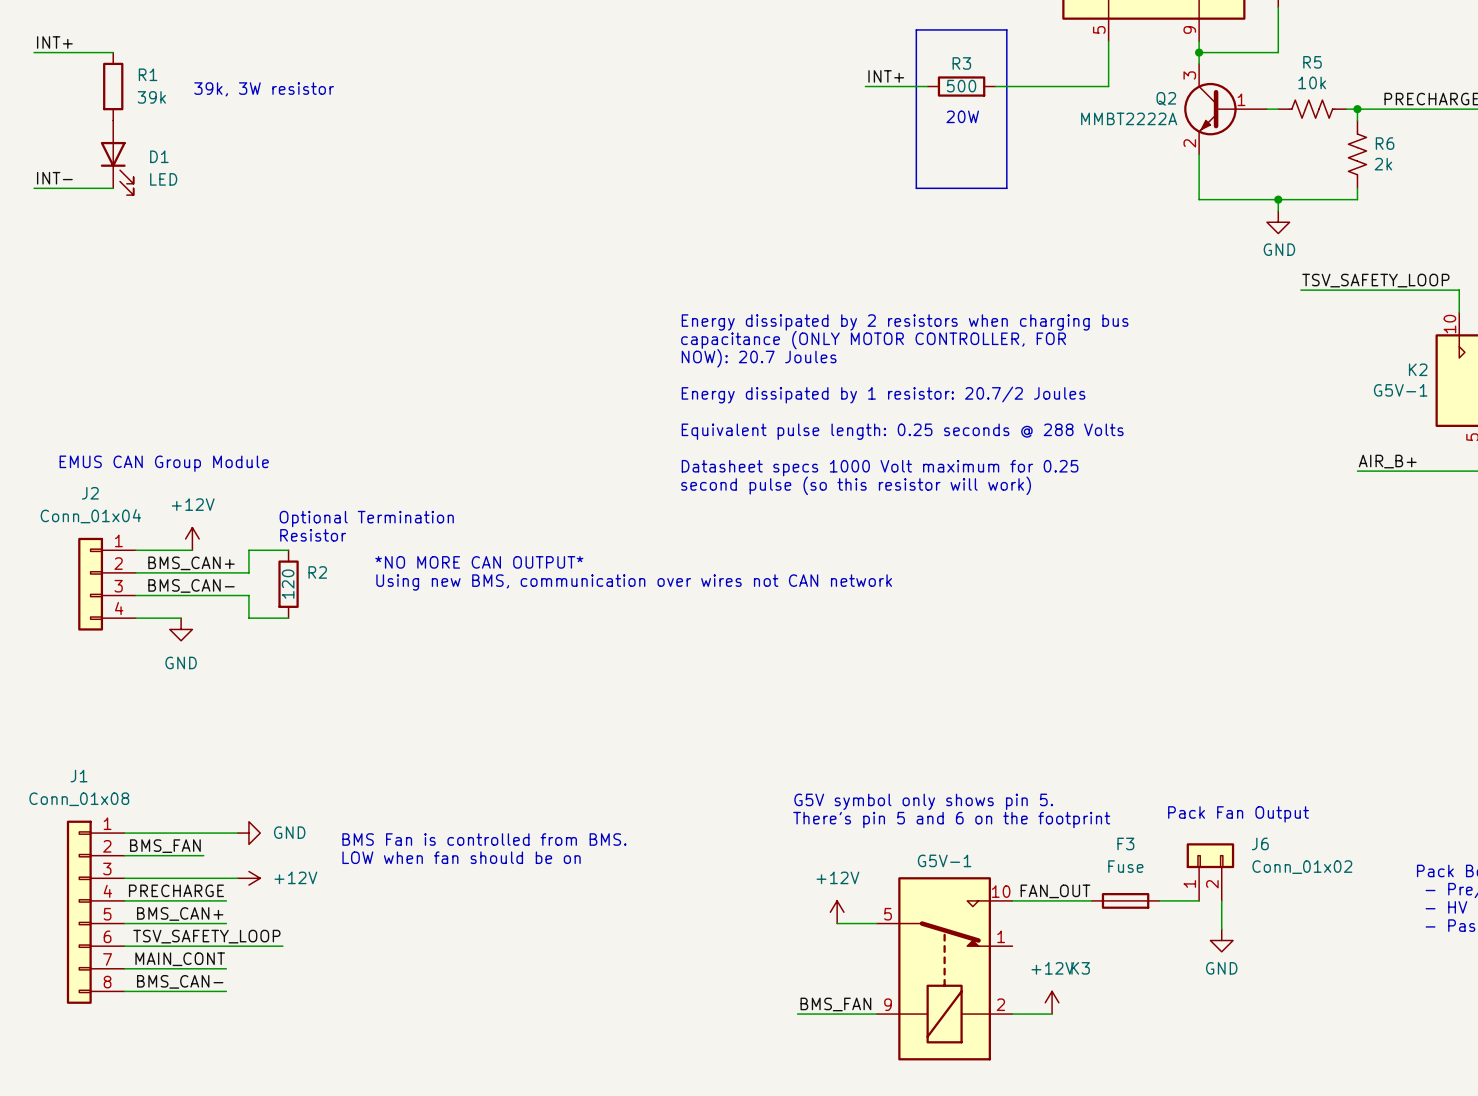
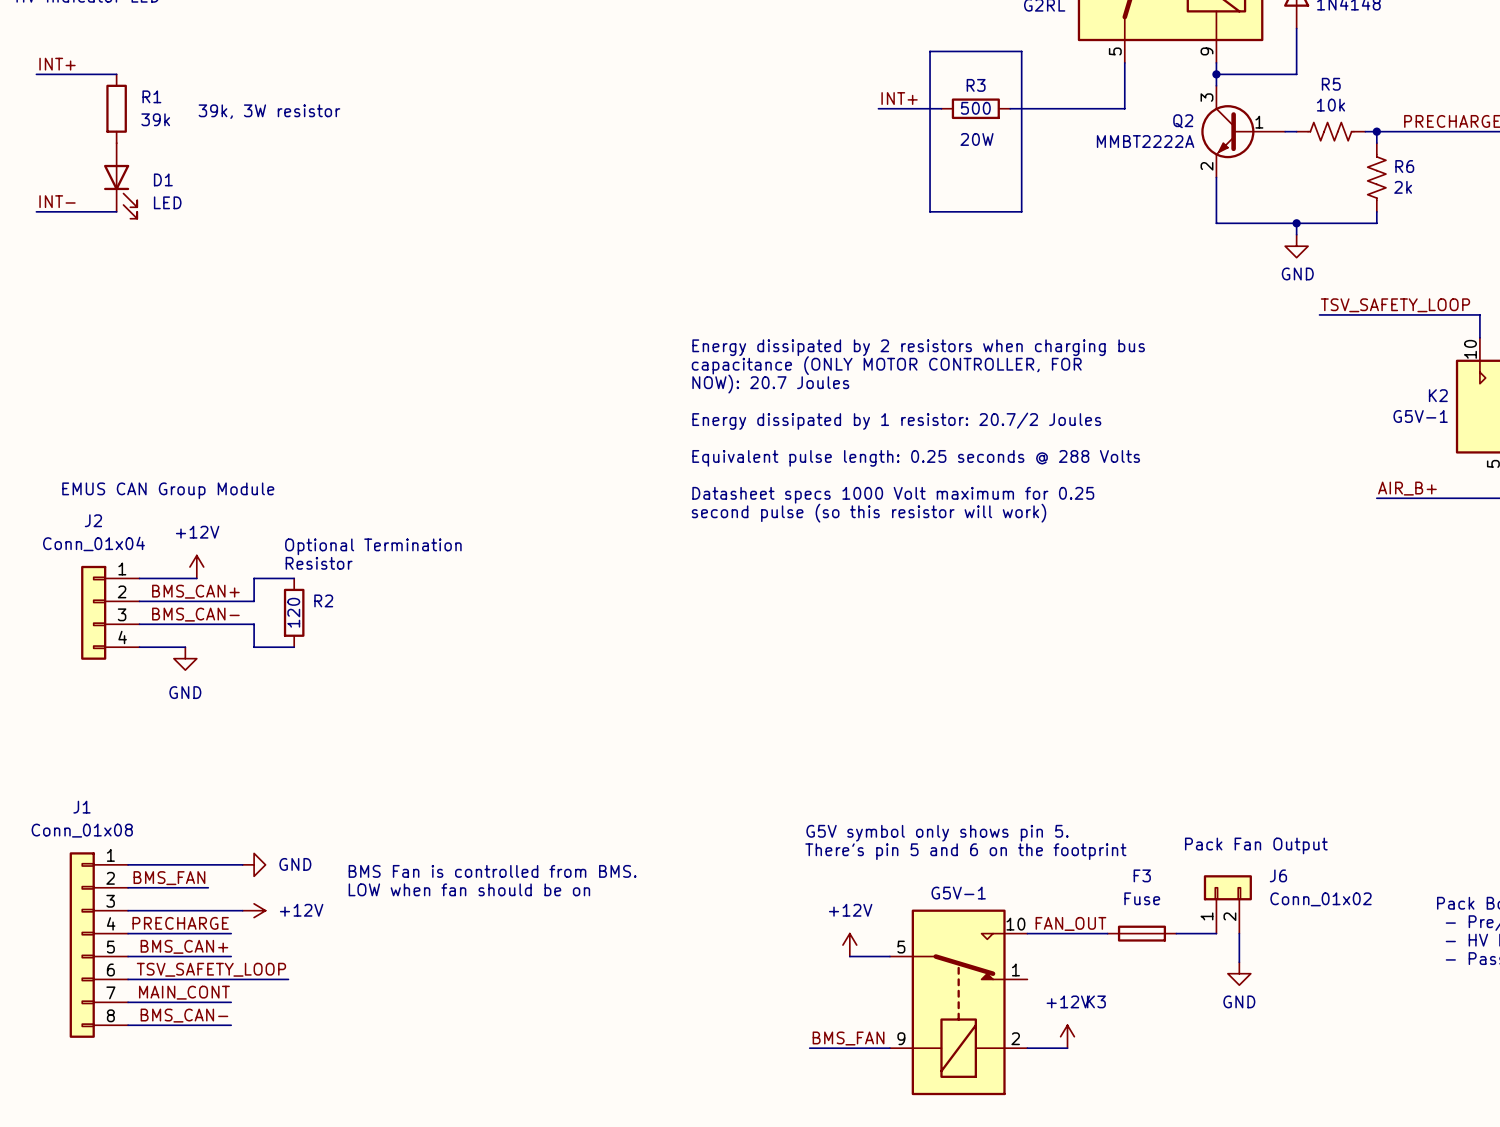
text: *NO MORE CAN OUTPUT* (479, 562) -> none
text: Using new BMS, communication over wires not CAN network (634, 582) -> none

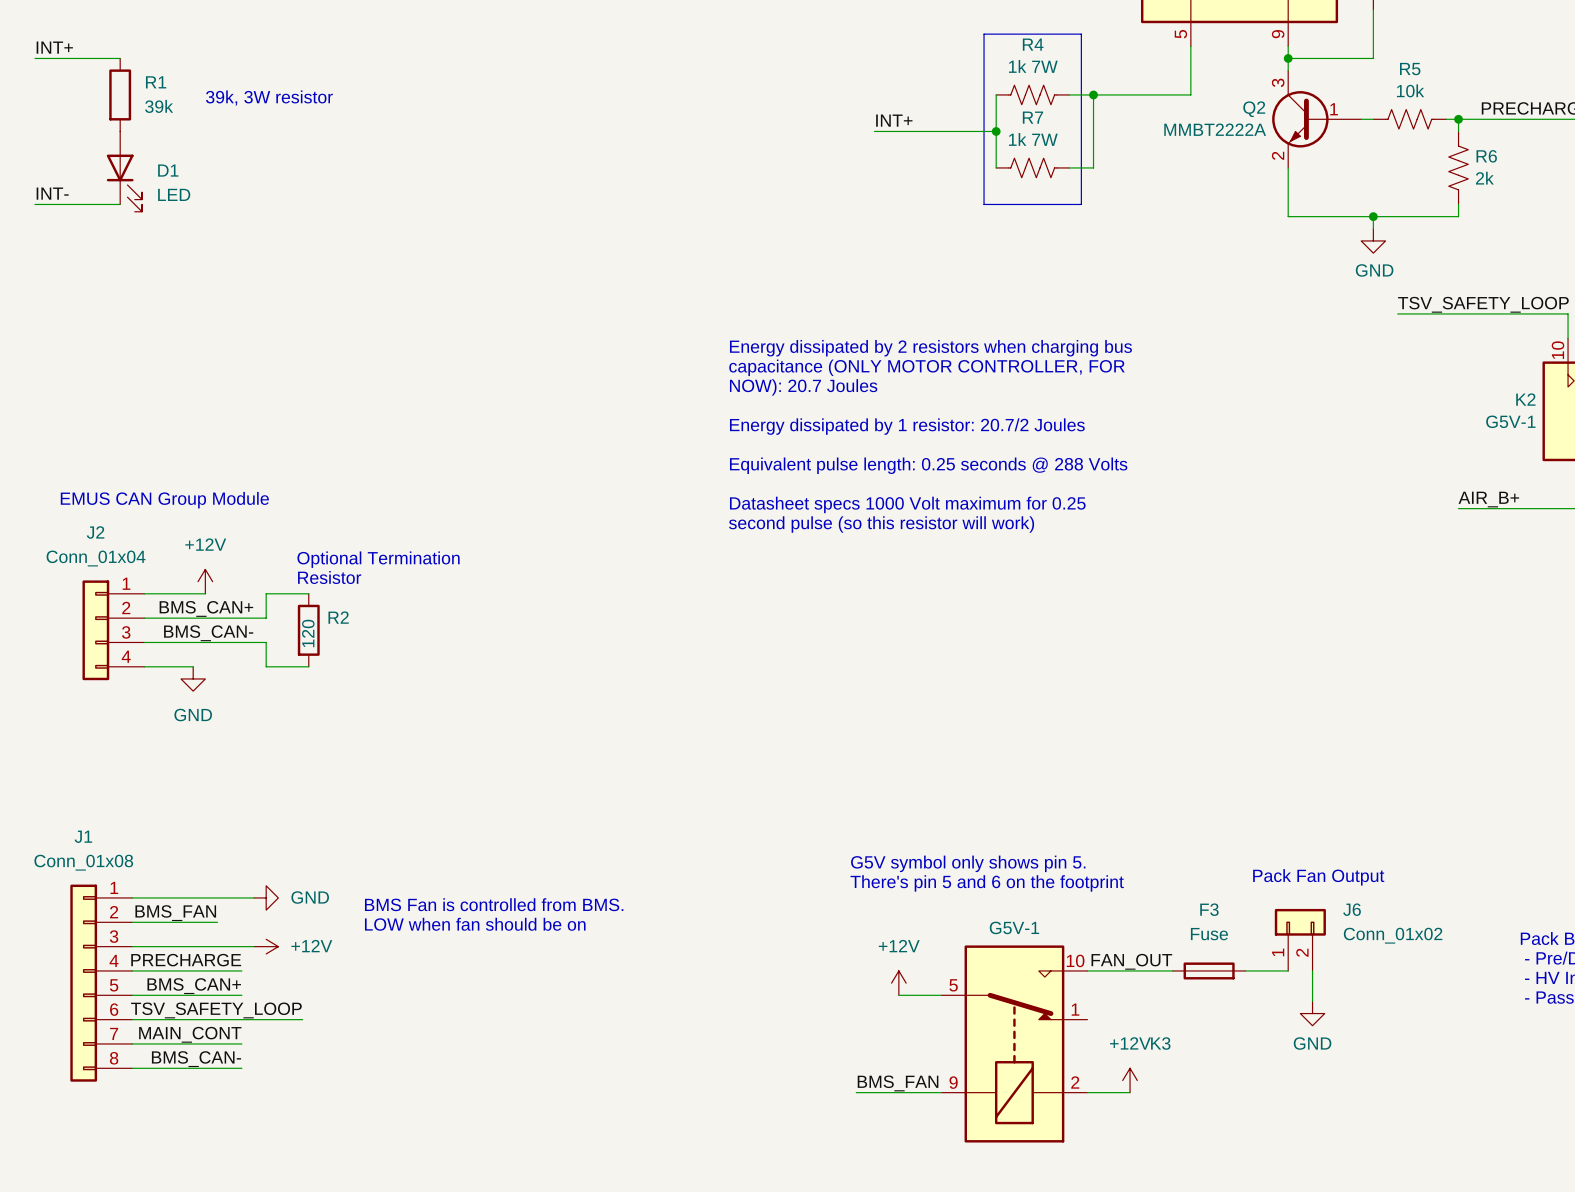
label position: INT+ (899, 98) -> INT+ (894, 120)
wire: (878, 108) (941, 108) -> (996, 167) (996, 94)
R3: 500 (975, 108) -> none
R4: none -> 1k 7W (1032, 94)
wire: none -> (1093, 94) (1093, 167) (1069, 167)
junction: none -> (1093, 94)
text: 20W (977, 139) -> none
wire: none -> (874, 131) (996, 131)
junction: none -> (996, 131)
R7: none -> 1k 7W (1032, 167)

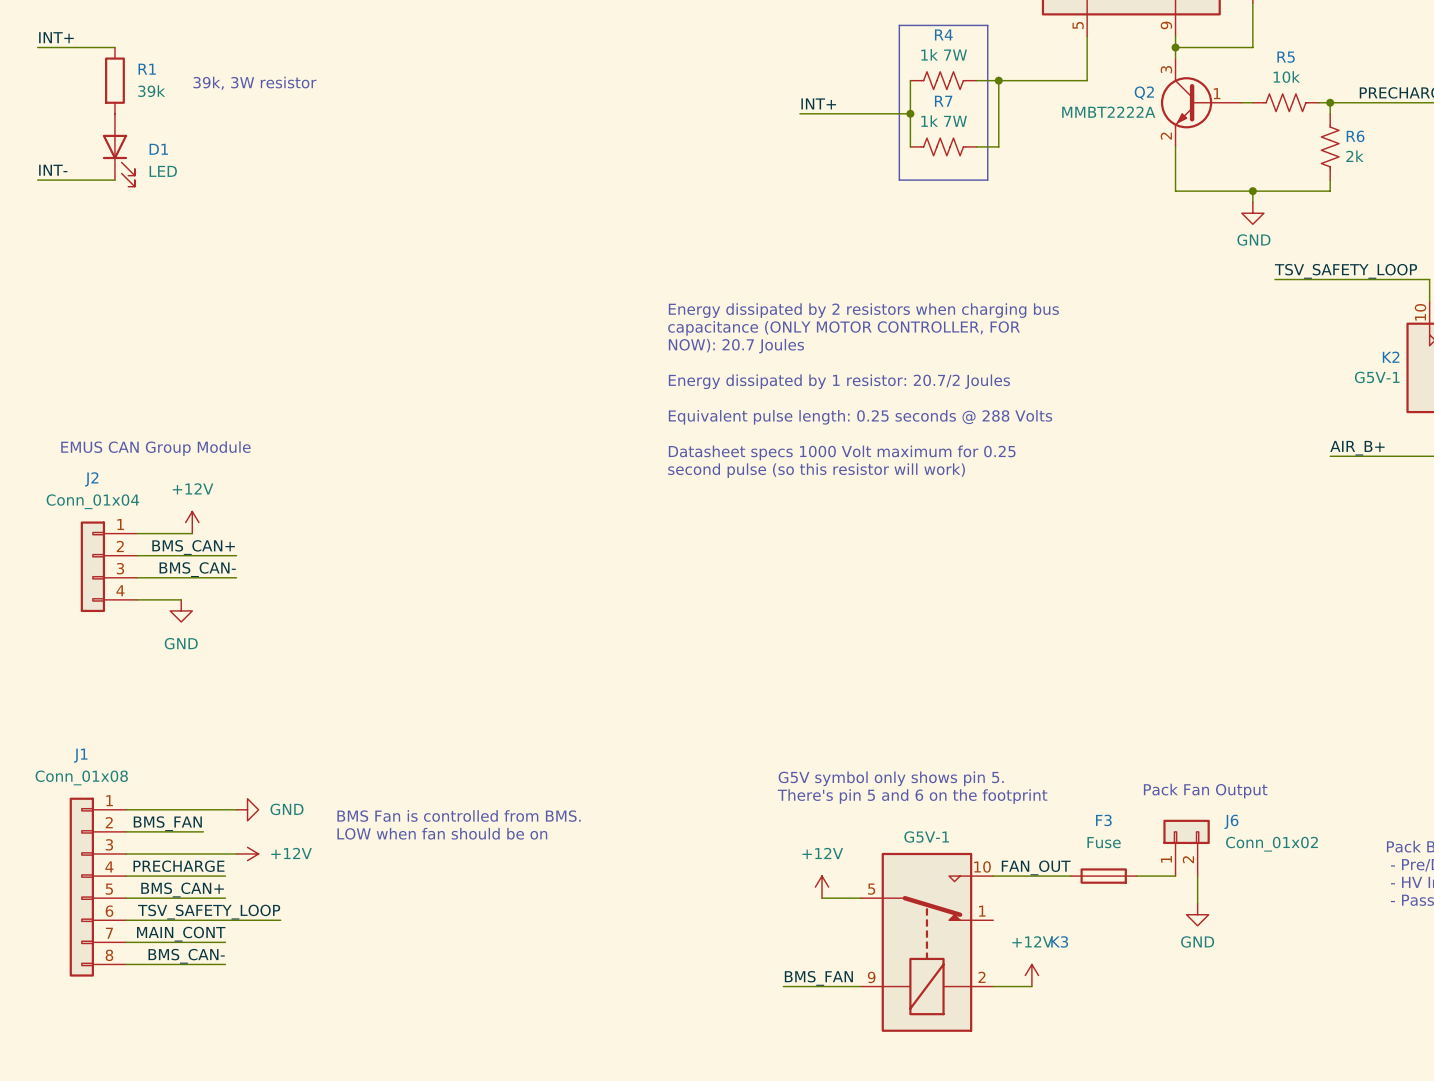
text: Optional Termination (378, 559) -> none
text: Resistor (329, 577) -> none
wire: (308, 593) (266, 593) (266, 618) (254, 618) -> none
R2: 120 (308, 630) -> none
wire: (254, 642) (266, 642) (266, 666) (308, 666) -> none

